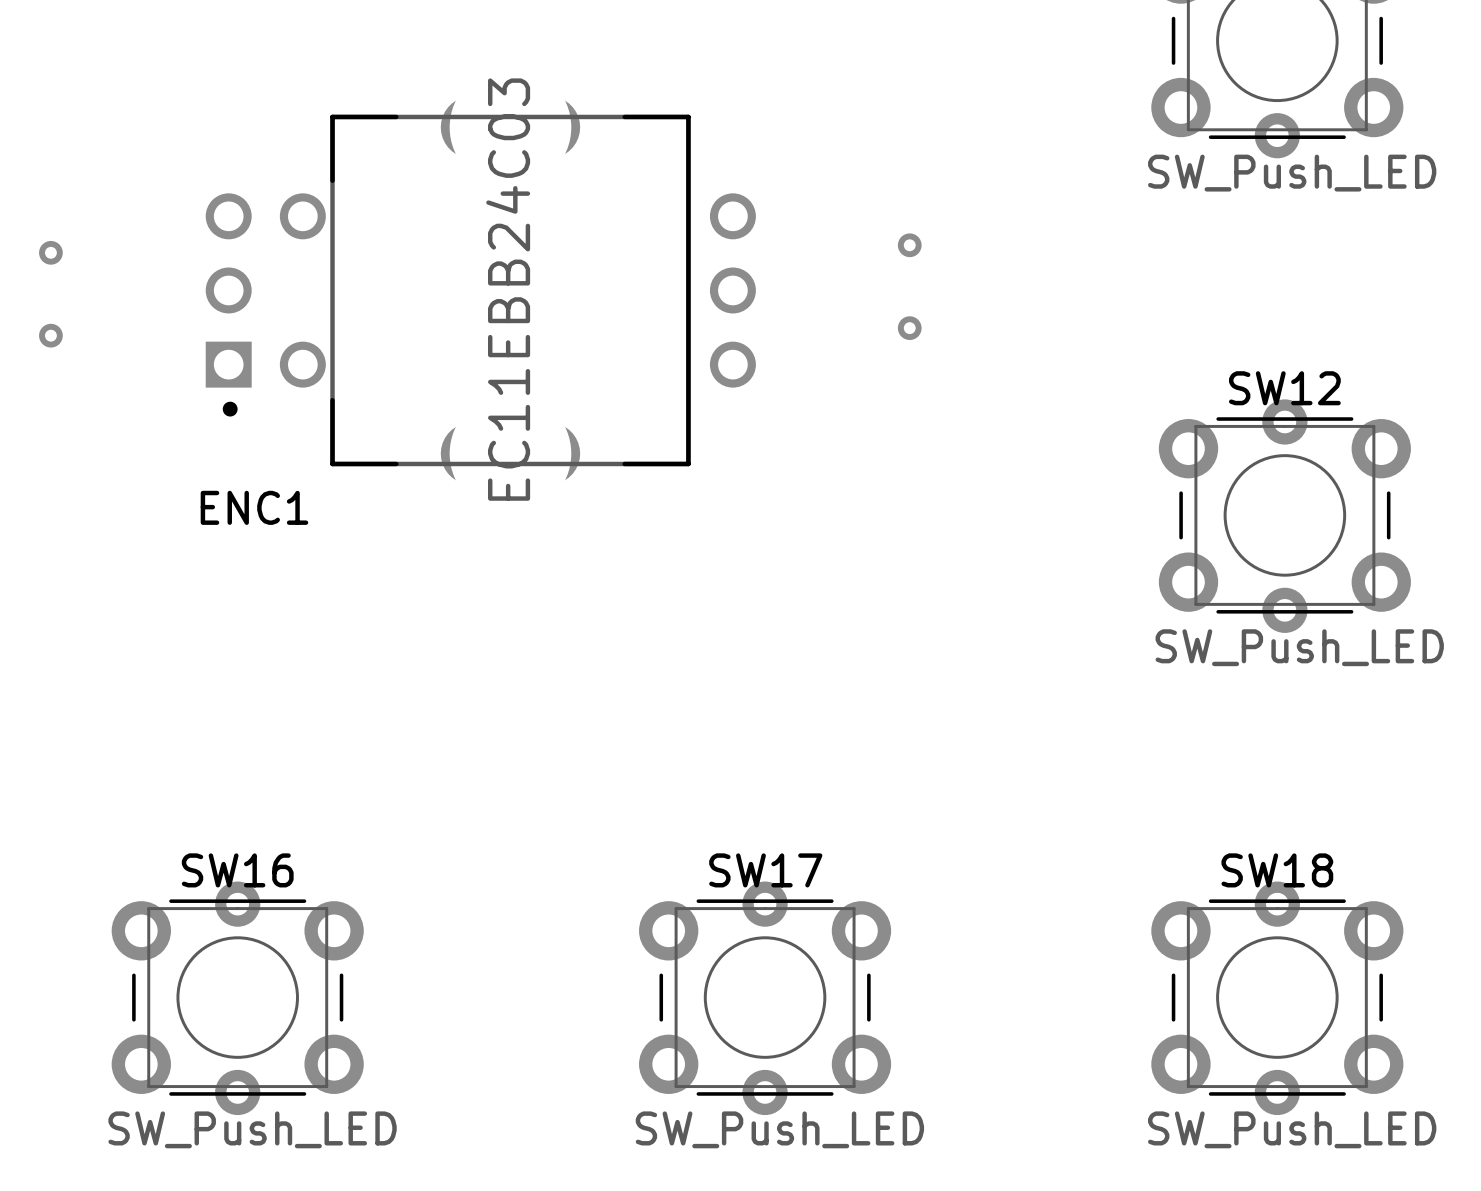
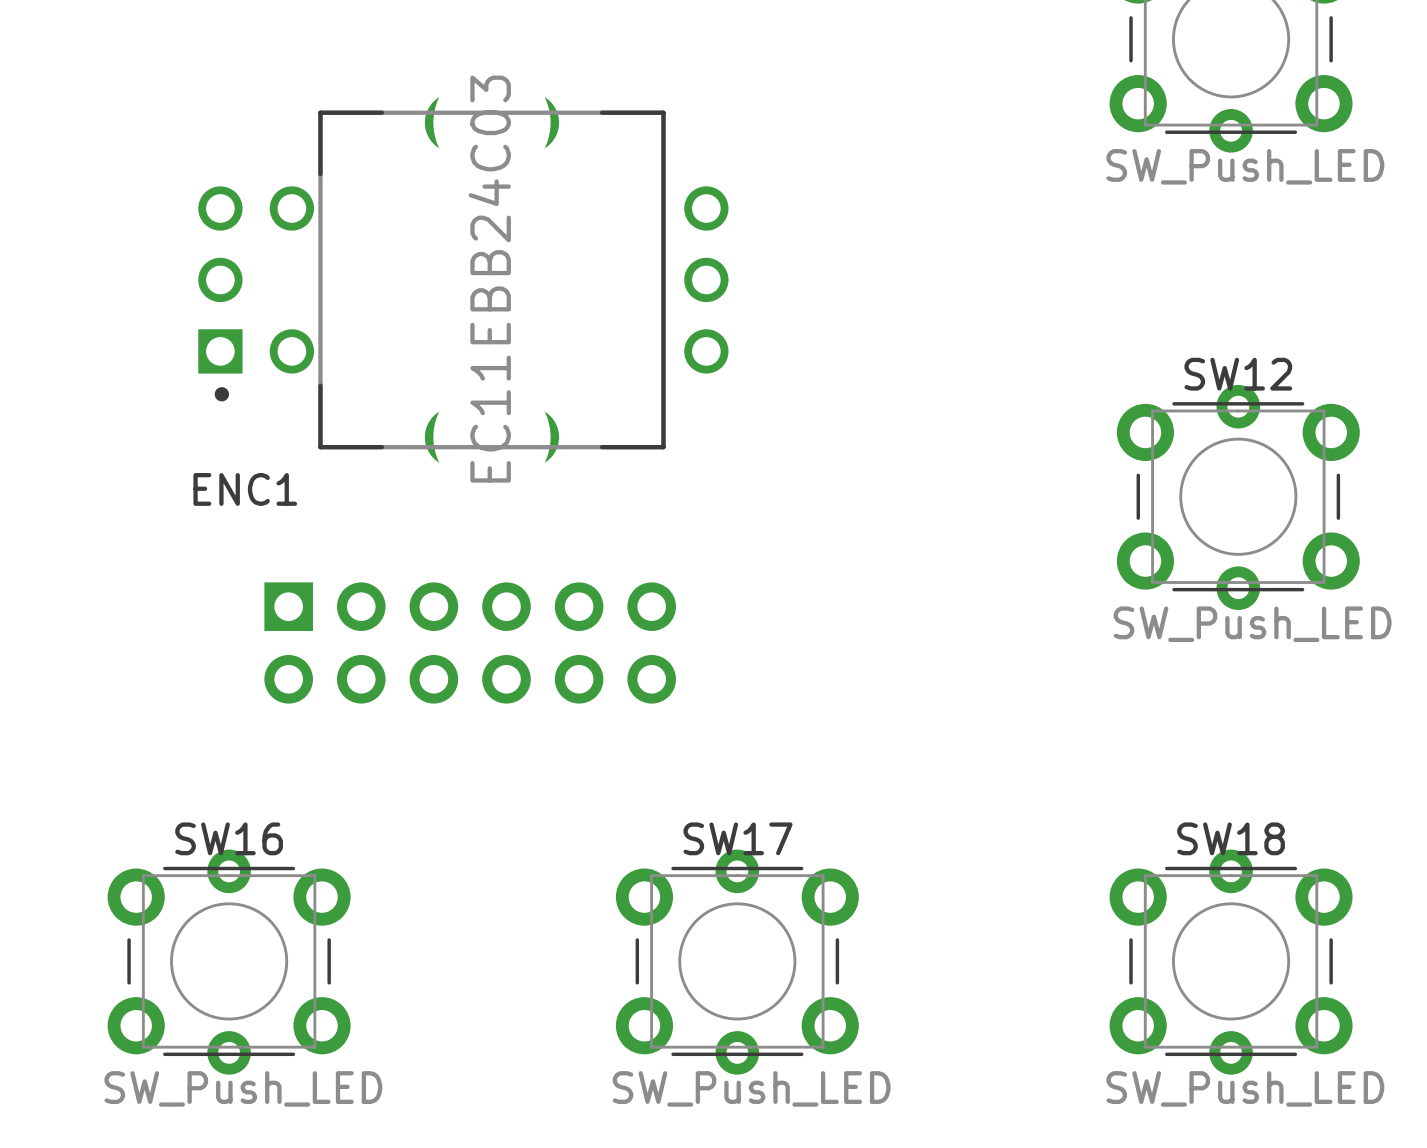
via: (909, 245) -> none
via: (50, 252) -> none
via: (909, 328) -> none
via: (50, 335) -> none
part: none -> (470, 642)

